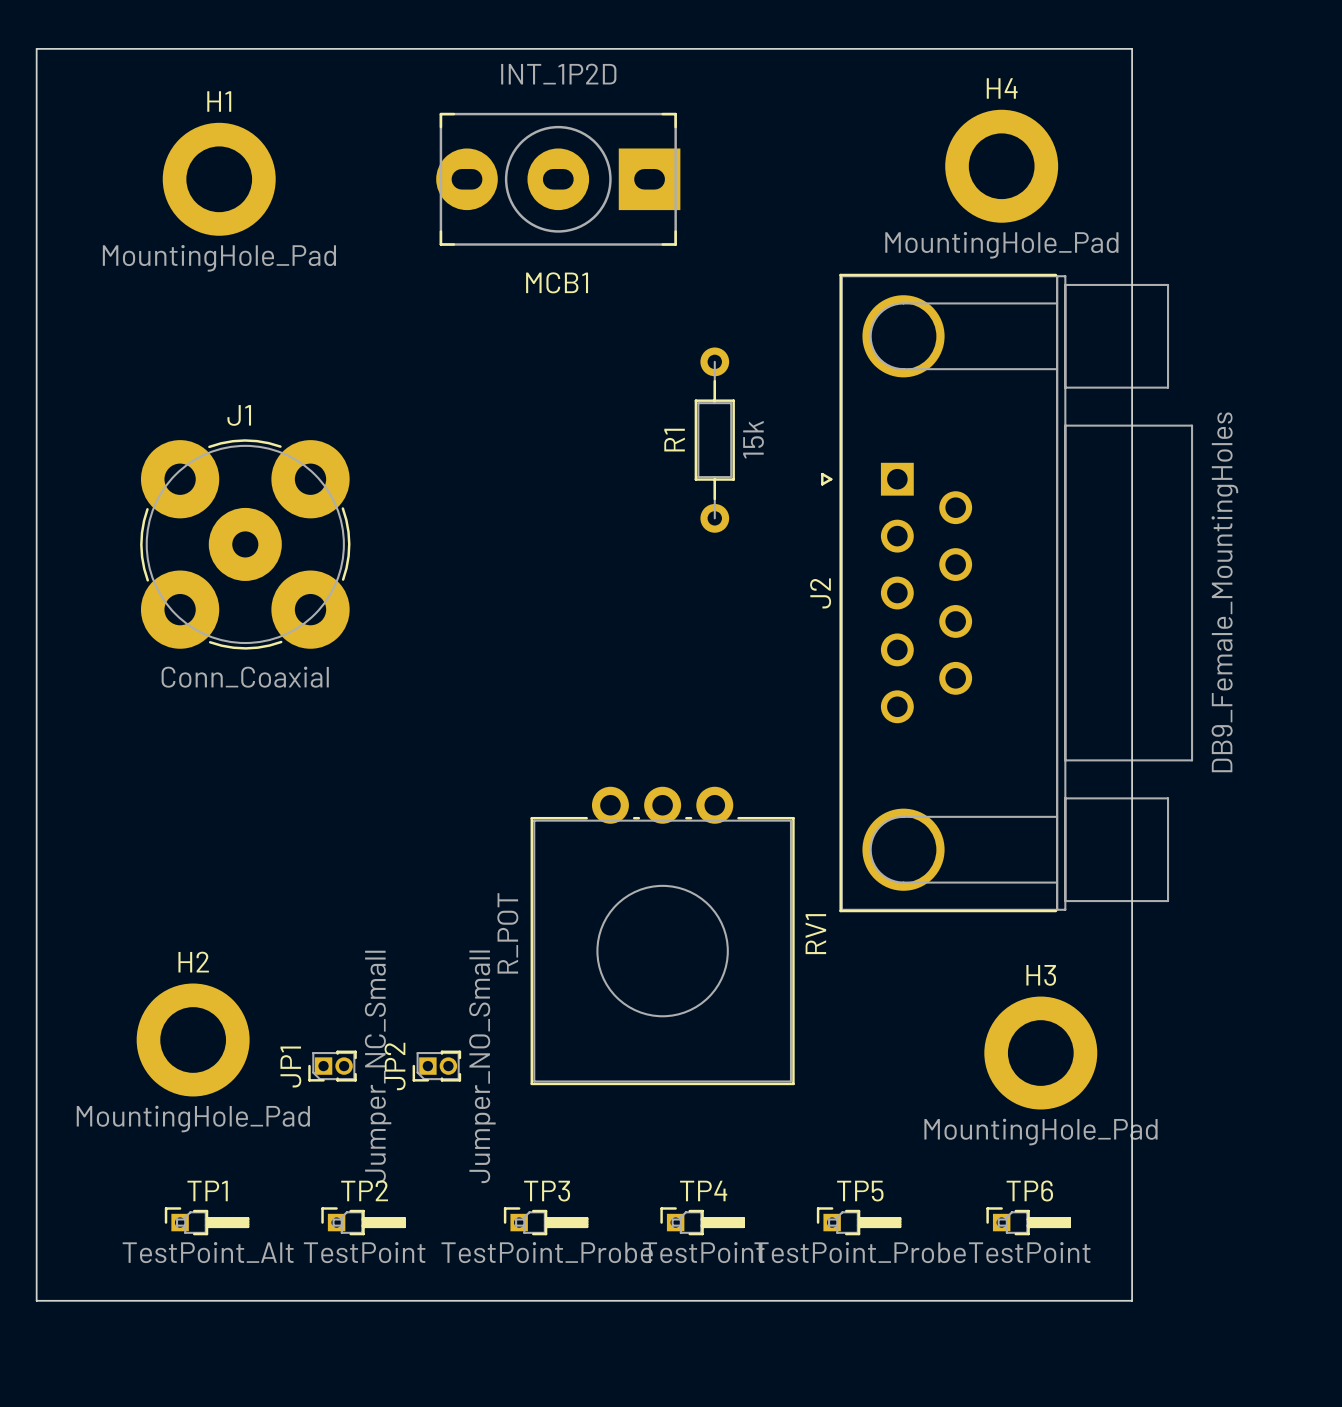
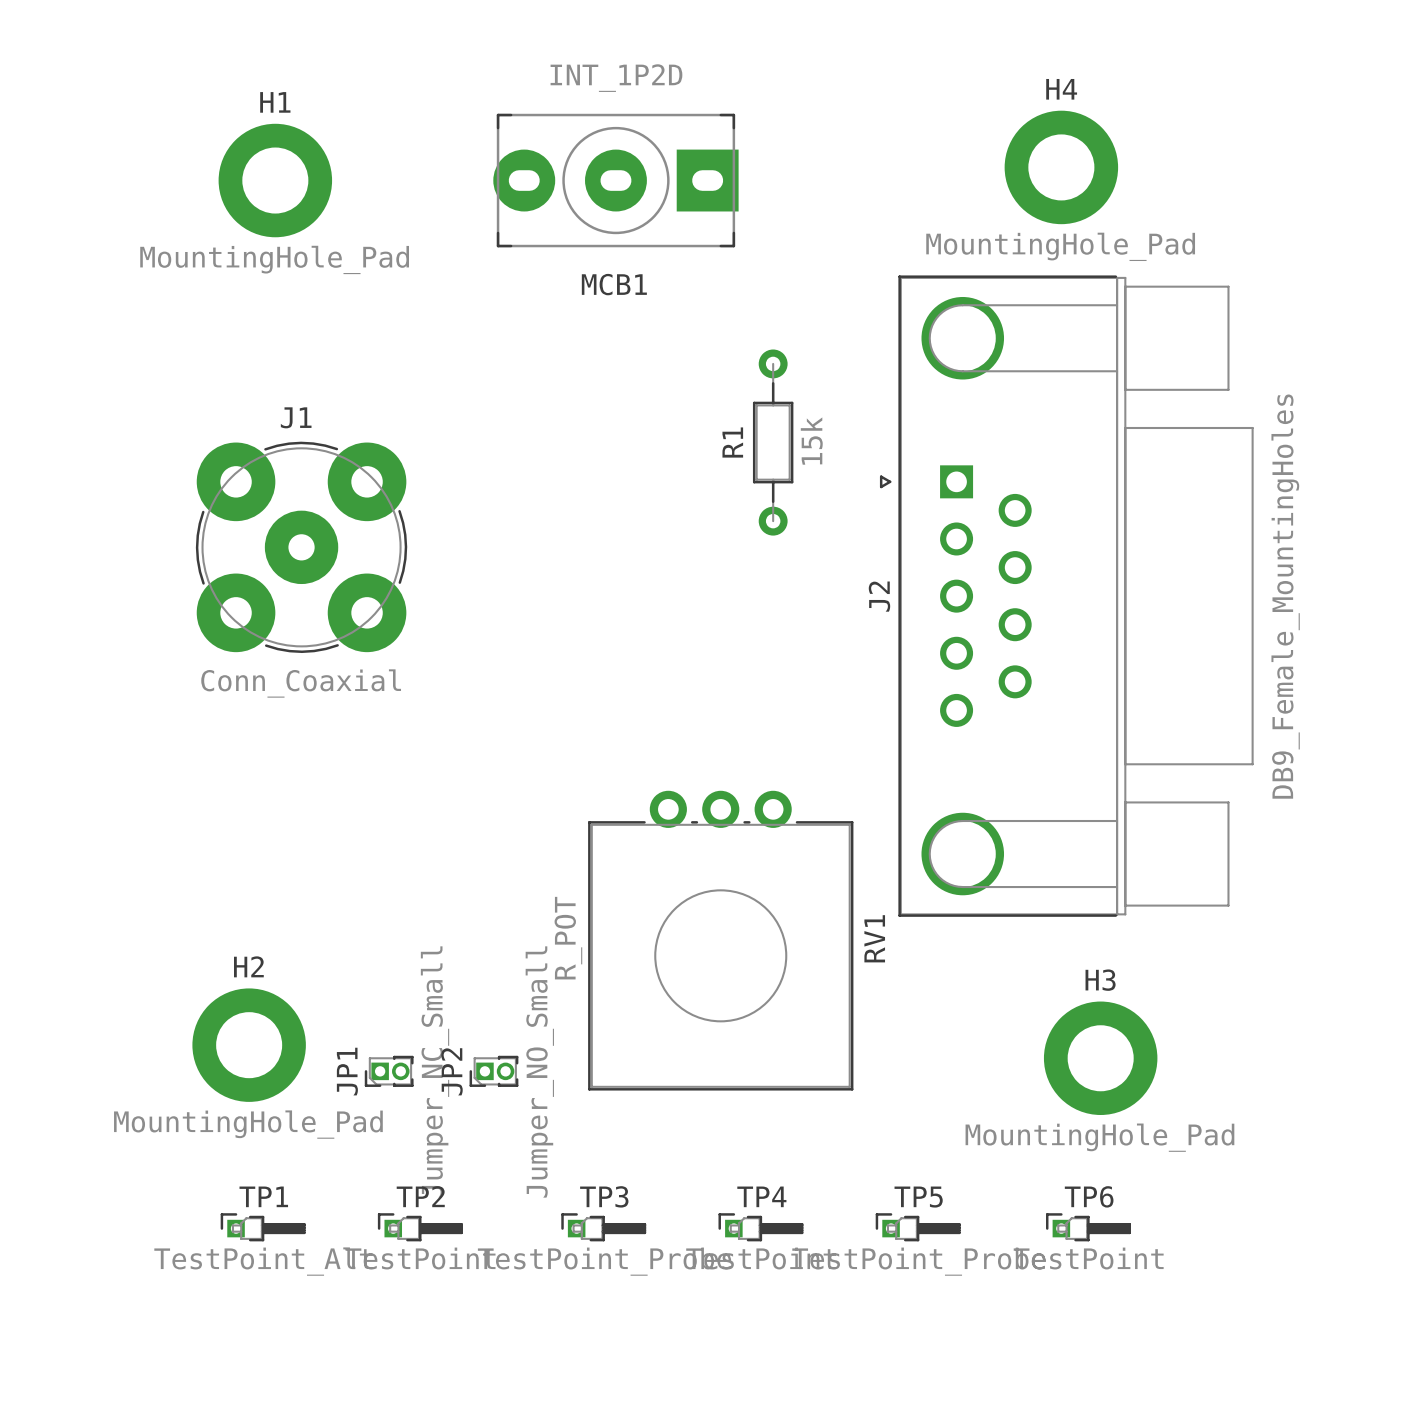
board edge: (36, 48) (1132, 48) (1132, 1300) (36, 1300) (36, 48) -> none

